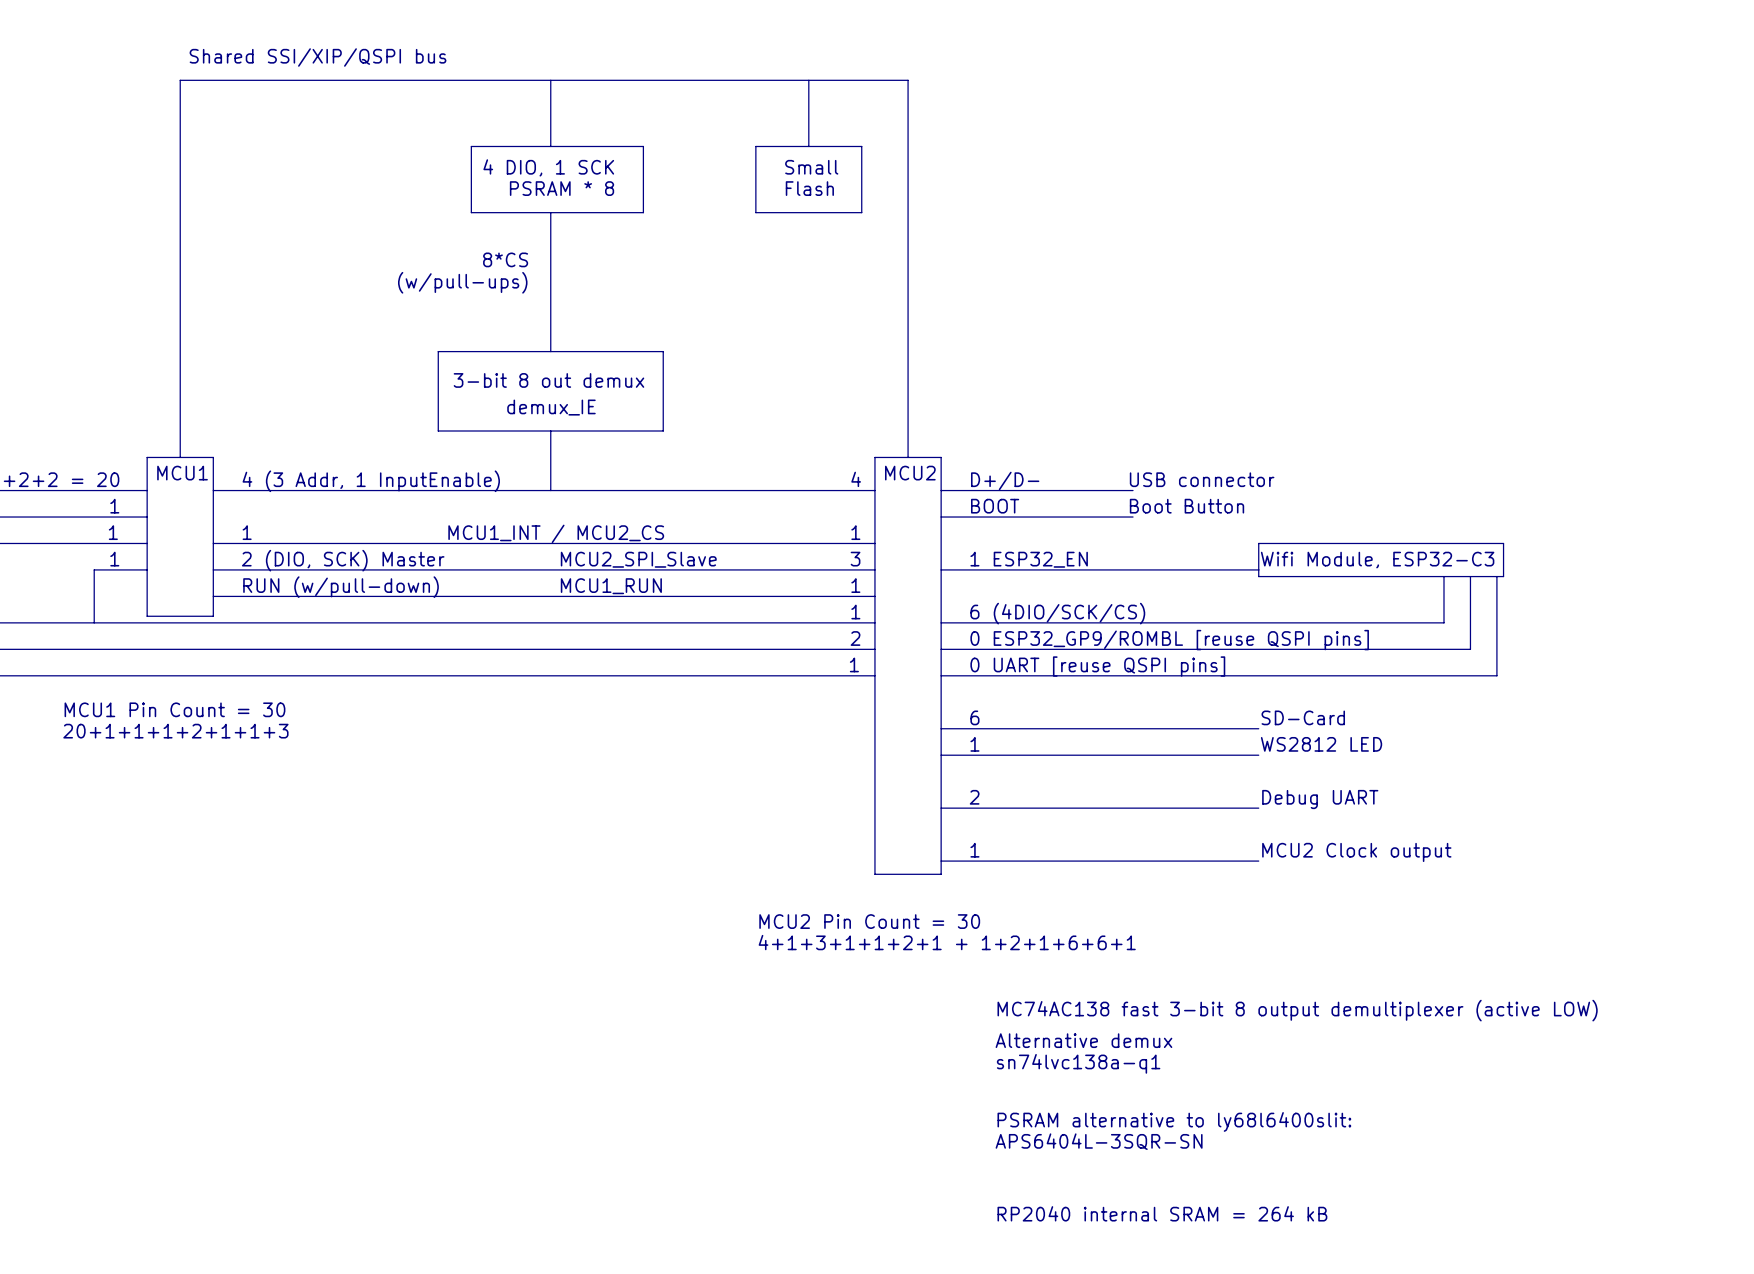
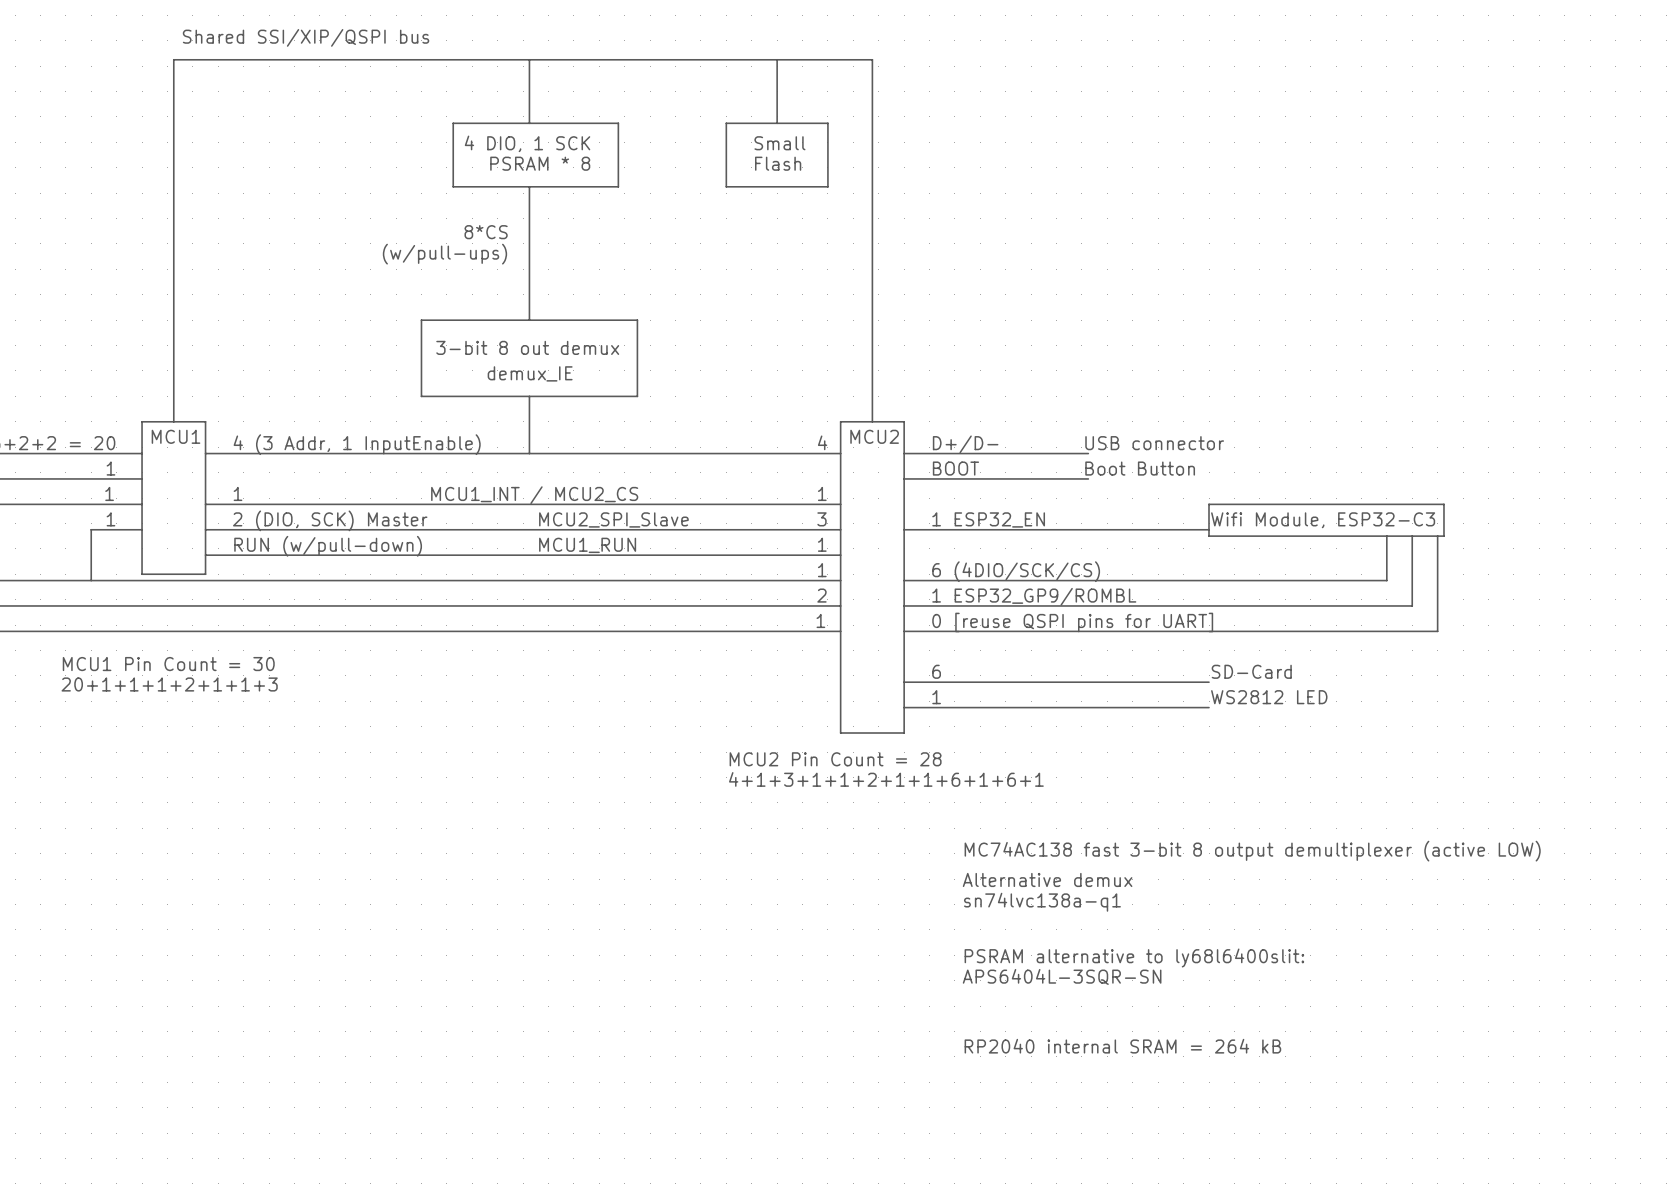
text: 0 ESP32_GP9/ROMBL [reuse QSPI pins] (1169, 640) -> 1 ESP32_GP9/ROMBL (1034, 596)
text: 0 UART [reuse QSPI pins] (1097, 666) -> 0 [reuse QSPI pins for UART] (1072, 622)
line: (874, 781) (874, 874) (941, 874) (941, 781) -> (840, 733) (904, 733)
text: 2 (974, 797) -> none
text: Debug UART (1320, 799) -> none
line: (941, 808) (1258, 808) -> none
text: none -> MCU2 Pin Count = 28 (835, 759)
text: none -> 4+1+3+1+1+2+1+1+6+1+6+1 (886, 779)
text: 1 (974, 850) -> none
text: MCU2 Clock output (1356, 852) -> none
line: (941, 861) (1258, 861) -> none
text: MCU2 Pin Count = 30 (869, 921) -> none
text: 4+1+3+1+1+2+1 + 1+2+1+6+6+1 (947, 942) -> none
text position: MC74AC138 fast 3-bit 8 output demultiplexer (active LOW) (1297, 1010) -> MC74AC138 fast 3-bit 8 output demultiplexer (active LOW) (1252, 851)
text position: Alternative demux (1083, 1040) -> Alternative demux (1047, 879)
text position: sn74lvc138a-q1 (1078, 1063) -> sn74lvc138a-q1 (1042, 902)
text position: PSRAM alternative to ly68l6400slit: (1174, 1121) -> PSRAM alternative to ly68l6400slit: (1134, 958)
text position: APS6404L-3SQR-SN (1099, 1141) -> APS6404L-3SQR-SN (1062, 976)
text position: RP2040 internal SRAM = 264 kB (1162, 1213) -> RP2040 internal SRAM = 264 kB (1122, 1046)

